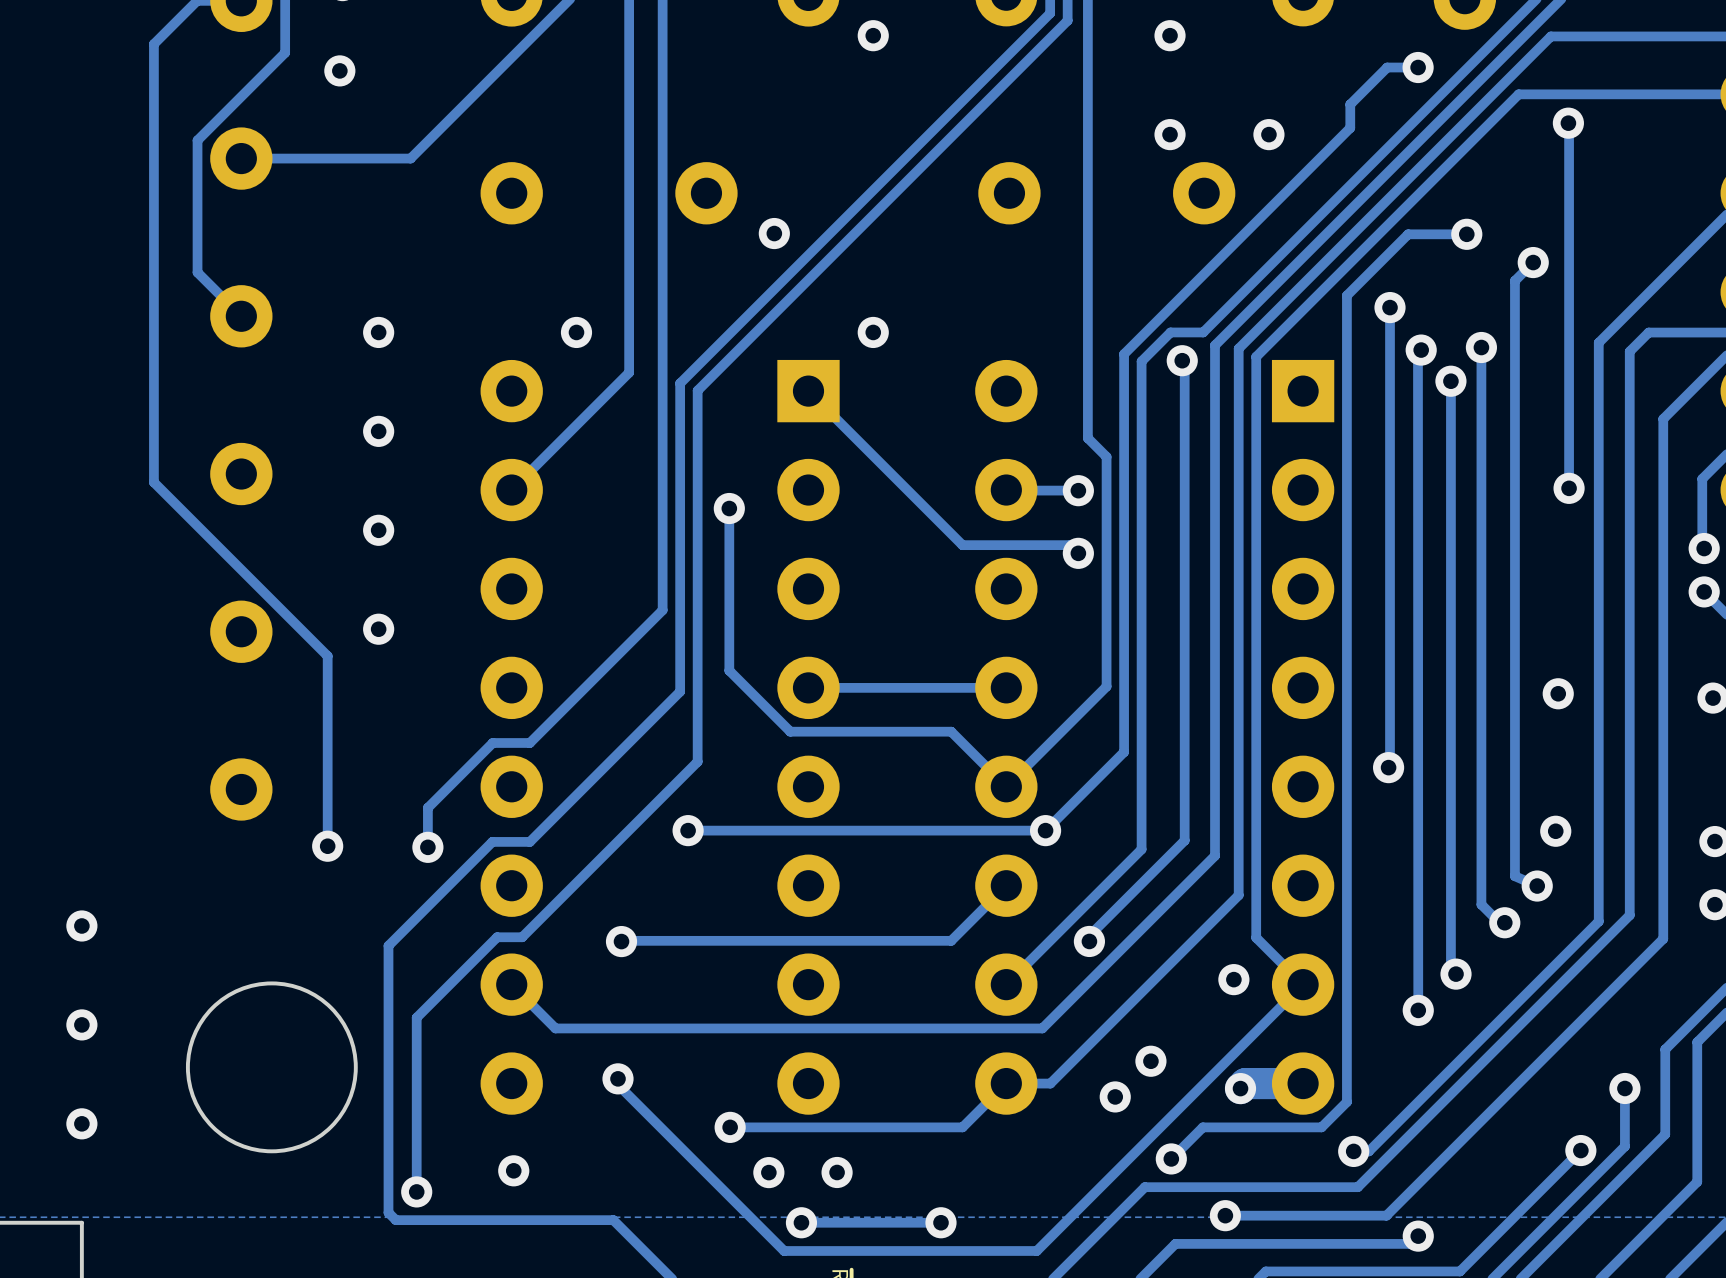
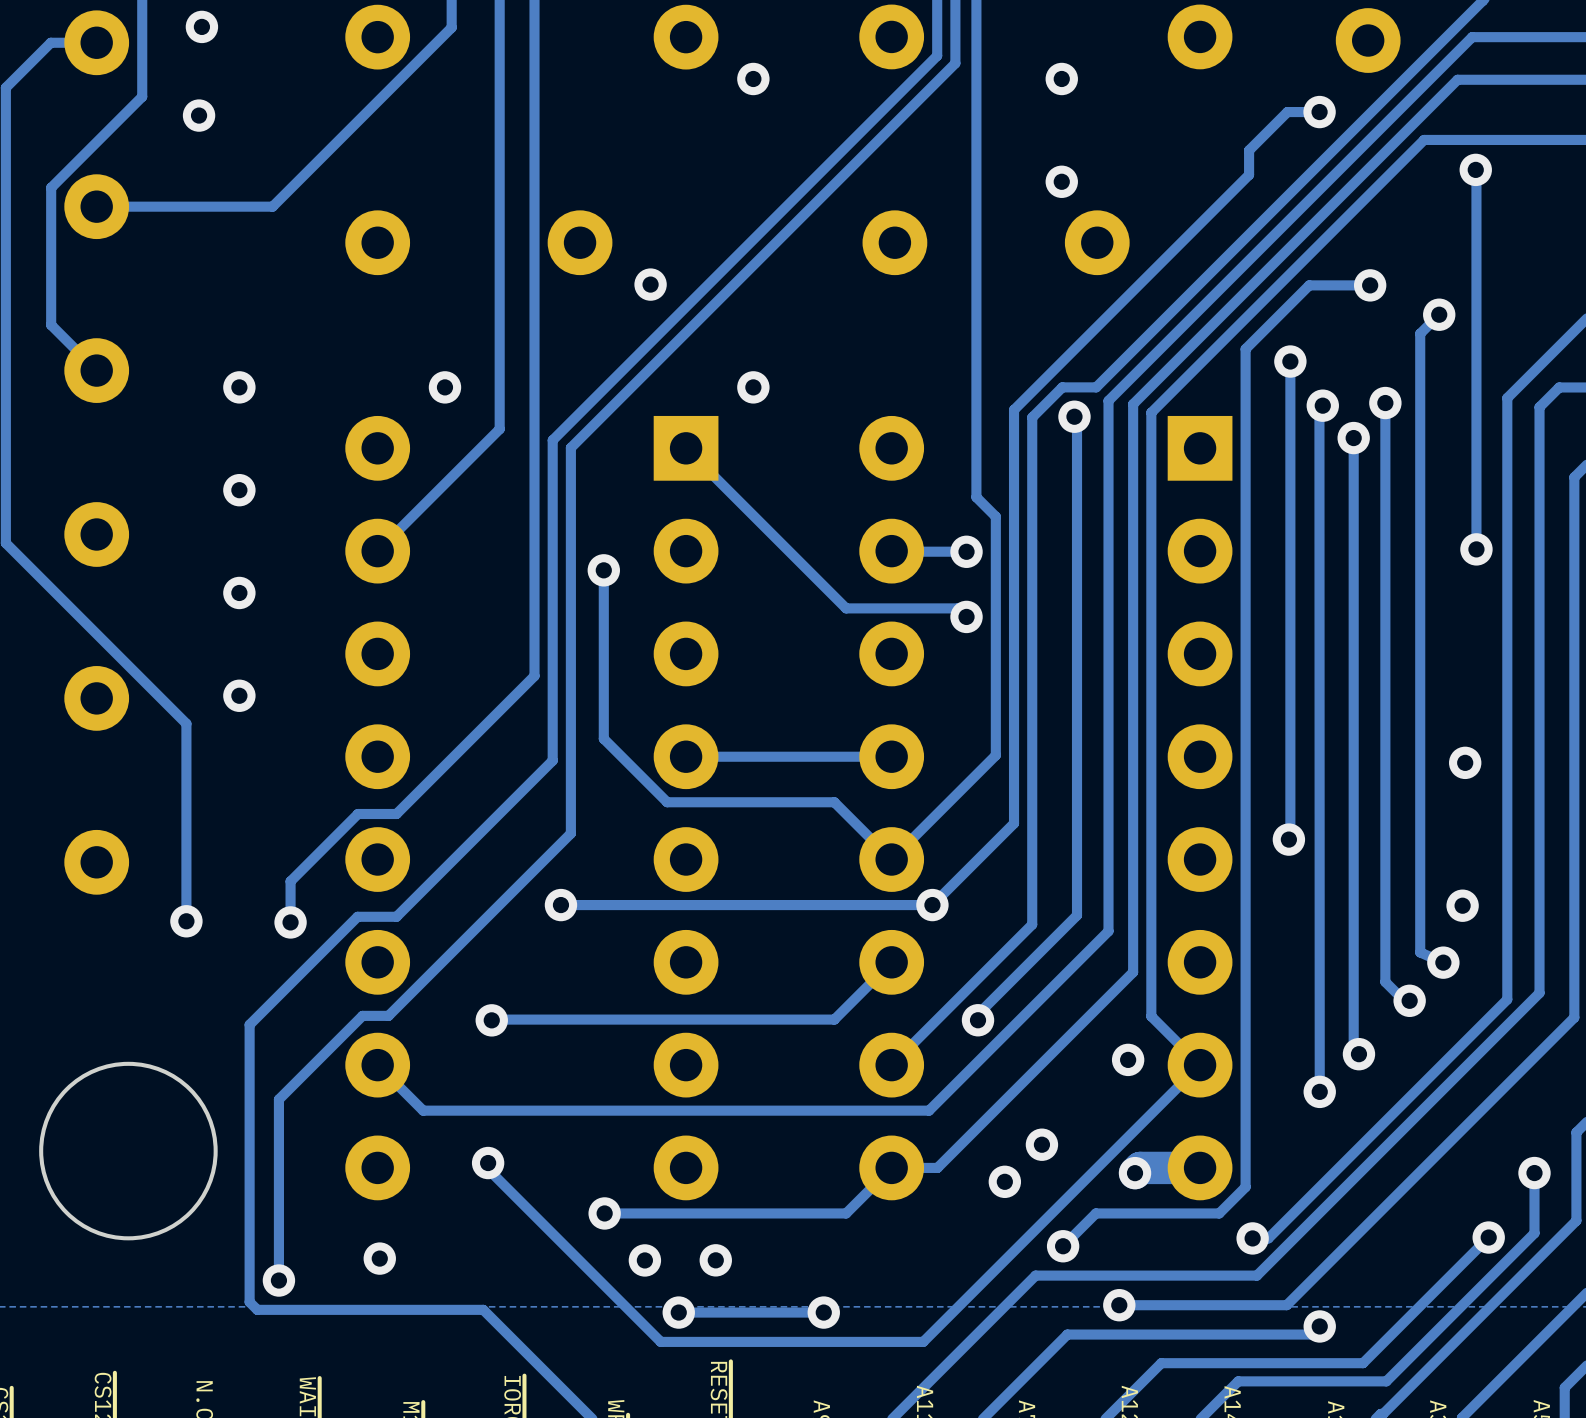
via: (1268, 134) -> none

